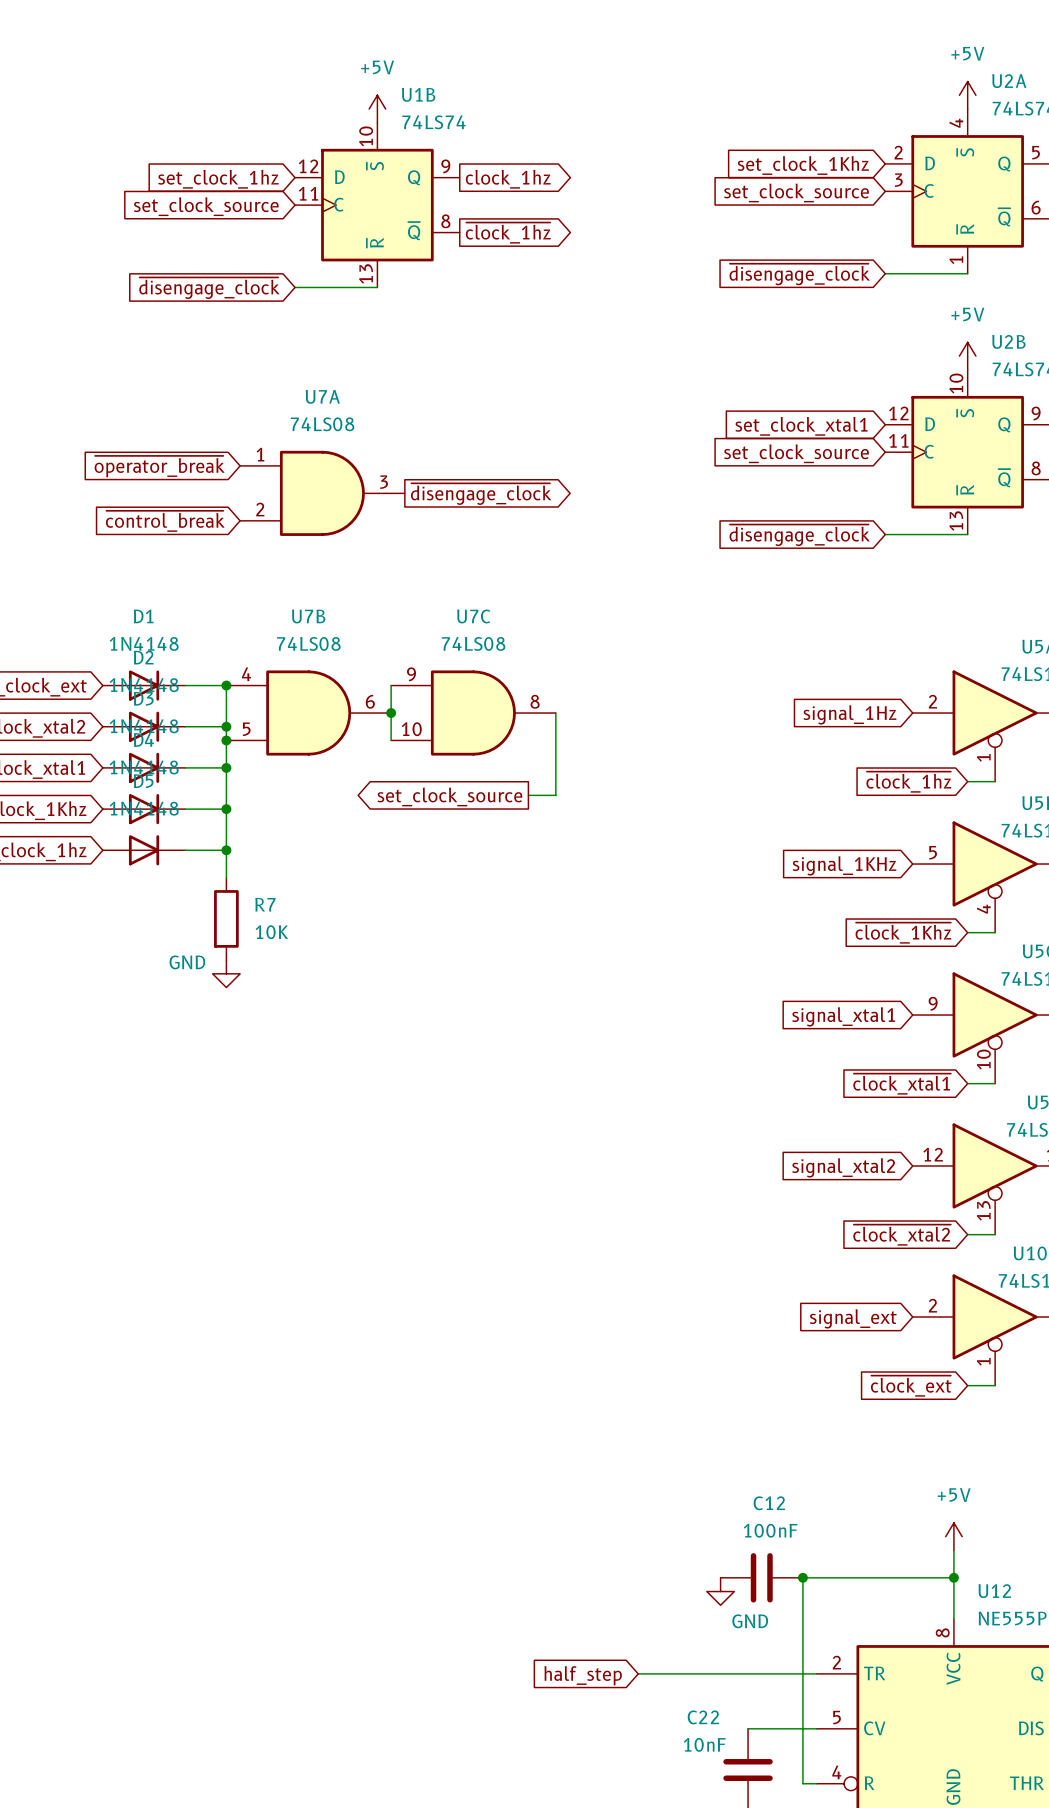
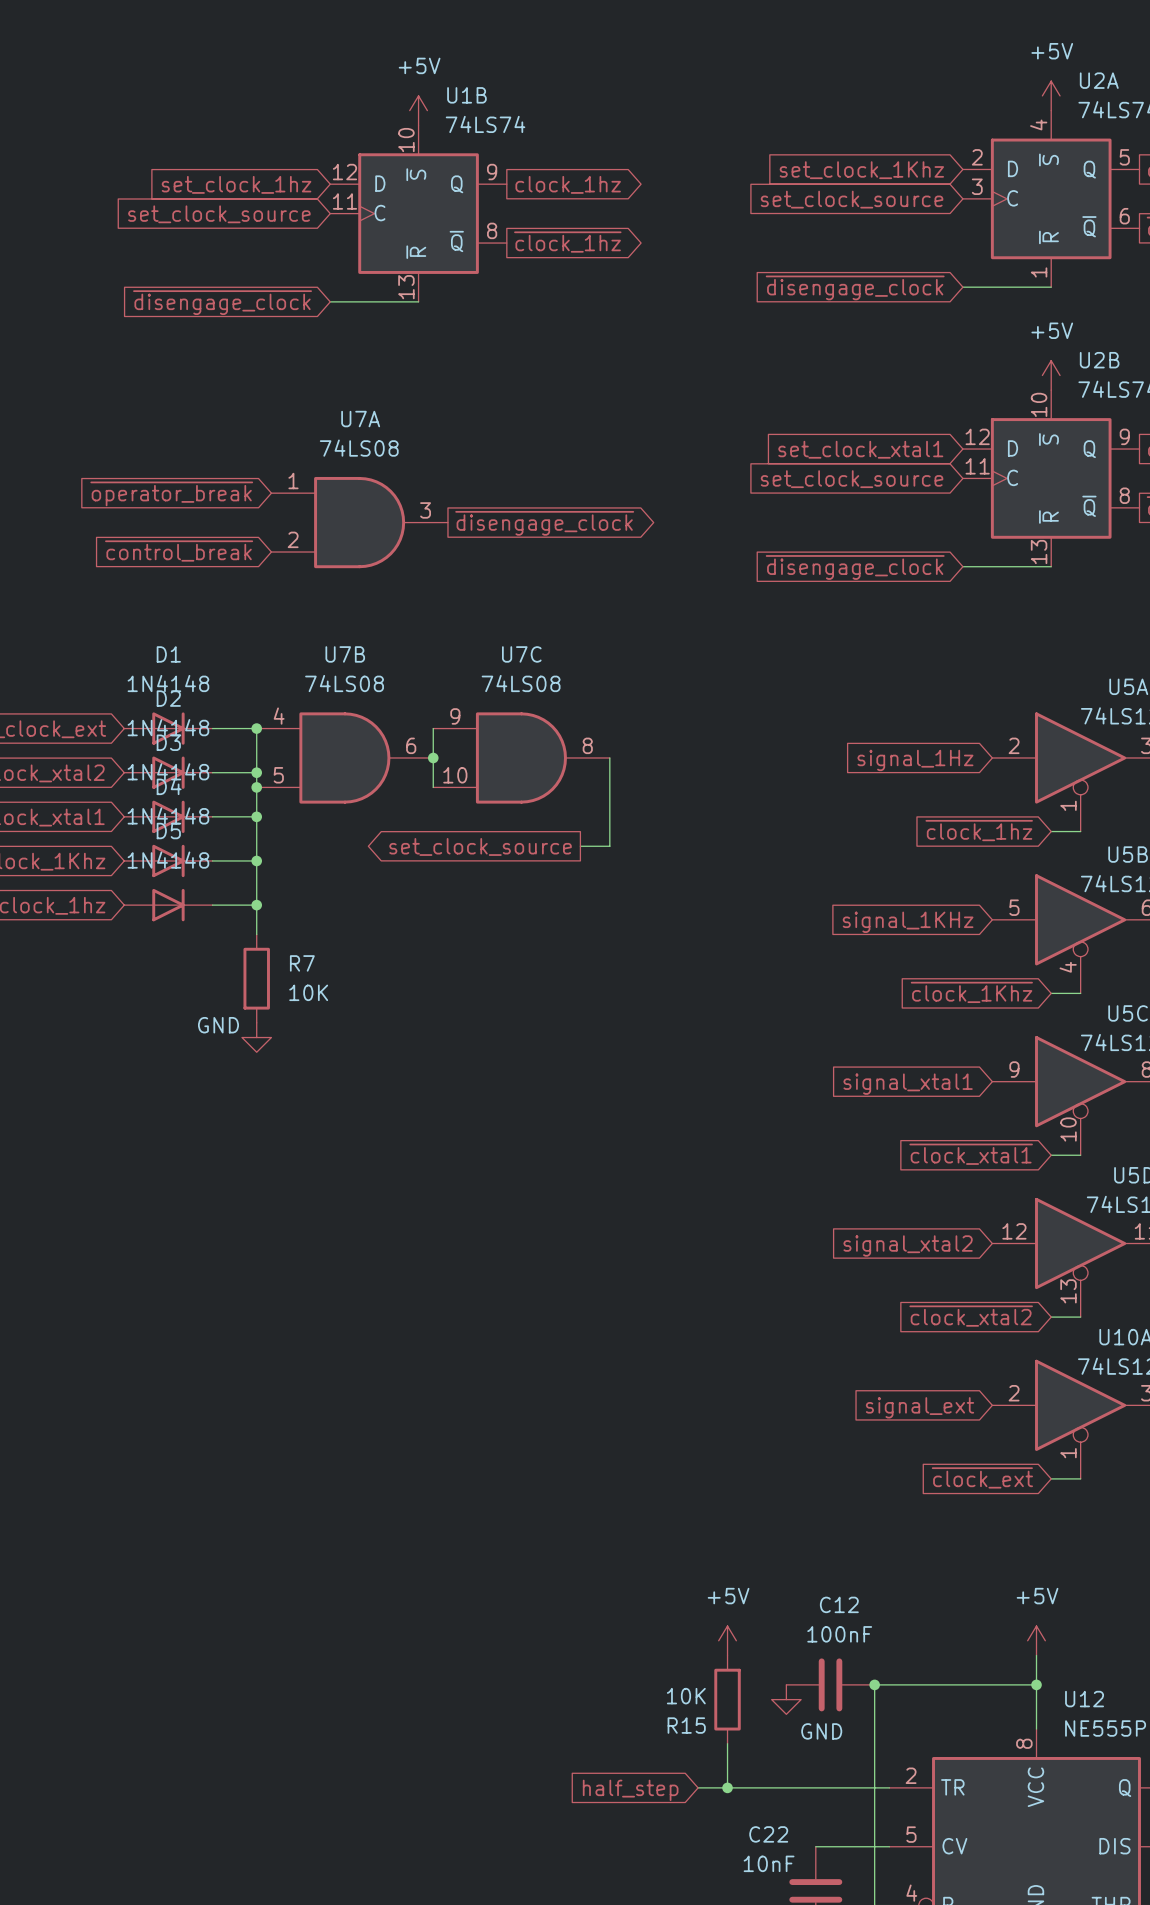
power symbol: none -> +5V (727, 1640)
R15: none -> 10K (727, 1699)
wire: none -> (727, 1743) (727, 1787)
junction: none -> (727, 1787)

